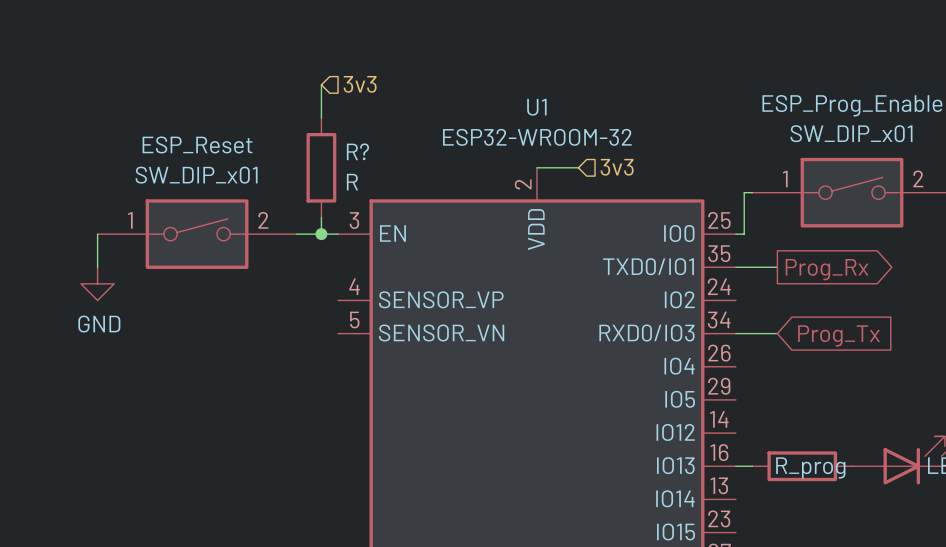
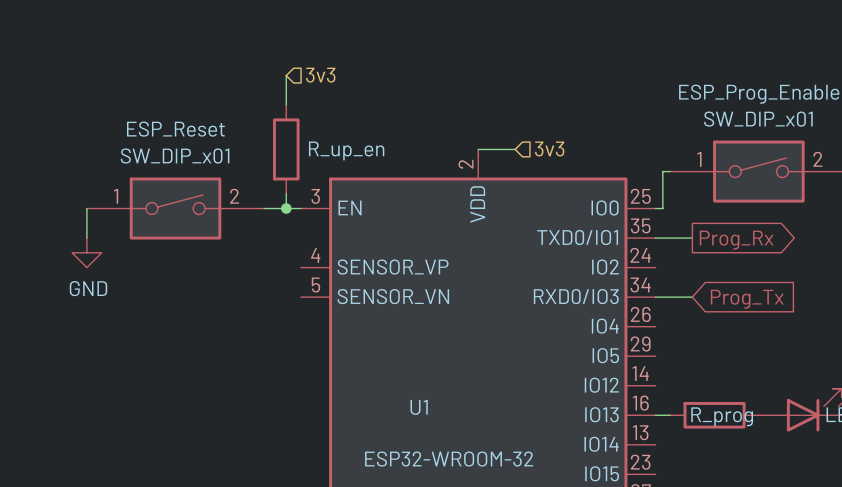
U1 name position: U1 (536, 107) -> U1 (419, 407)
U1 value position: ESP32-WROOM-32 (537, 137) -> ESP32-WROOM-32 (449, 459)
R? name: R? (357, 151) -> R_up_en (346, 150)
R? value: R (352, 182) -> none

